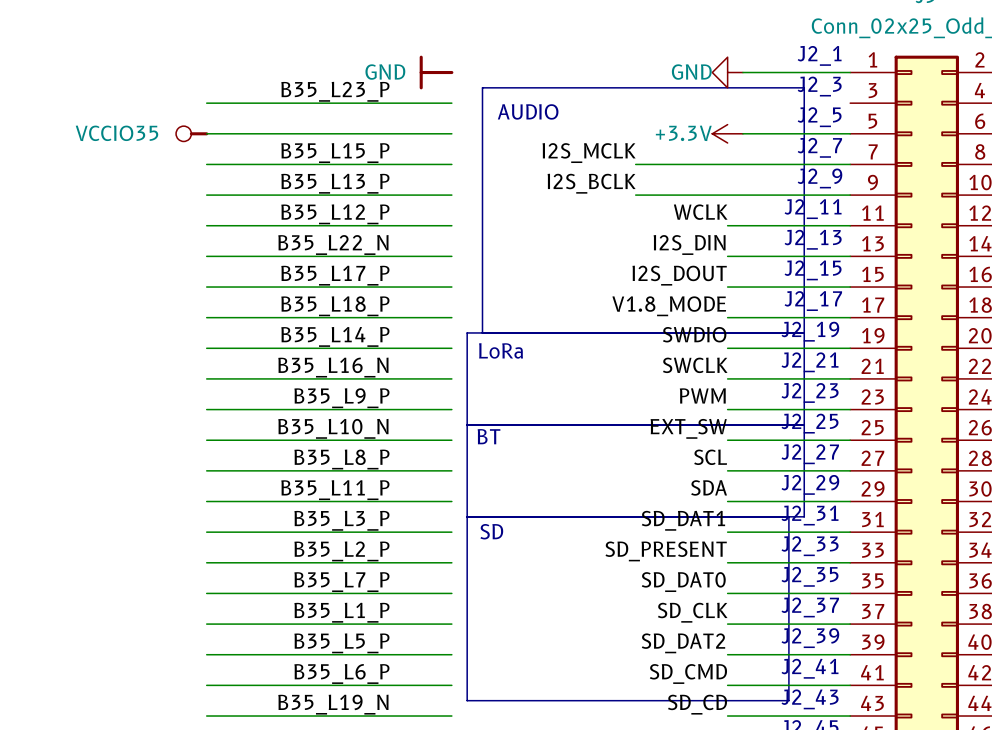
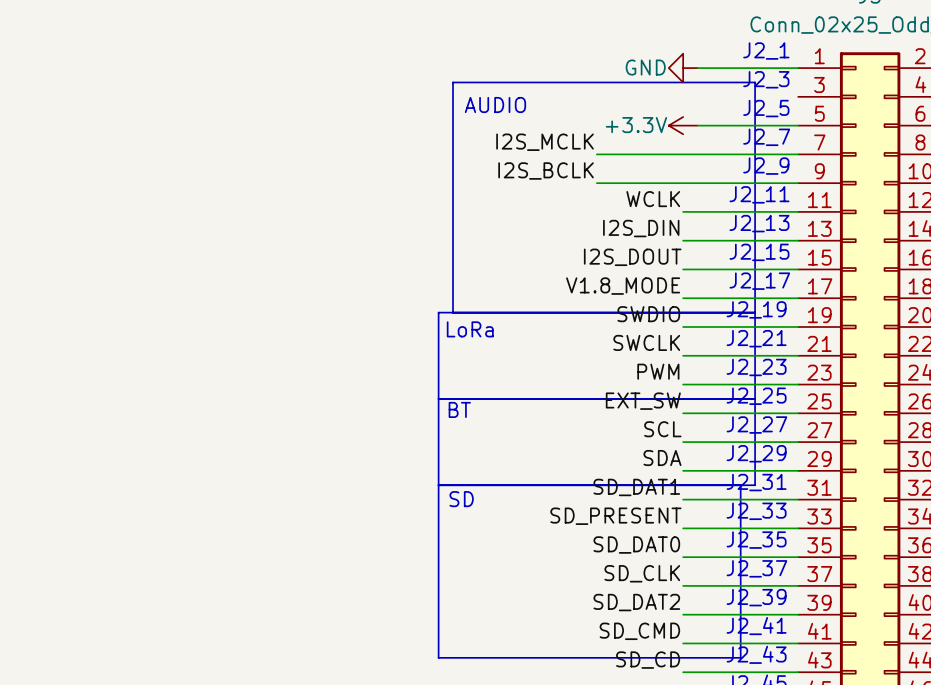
power symbol: GND (436, 72) -> none
label: B35_L23_P (335, 91) -> none
wire: (206, 103) (451, 103) -> none
power symbol: VCCIO35 (191, 133) -> none
wire: (206, 133) (451, 133) -> none
label: B35_L15_P (335, 153) -> none
wire: (206, 164) (451, 164) -> none
label: B35_L13_P (335, 183) -> none
wire: (206, 195) (451, 195) -> none
label: B35_L12_P (335, 214) -> none
wire: (206, 225) (451, 225) -> none
label: B35_L22_N (333, 244) -> none
wire: (206, 256) (451, 256) -> none
label: B35_L17_P (335, 275) -> none
wire: (206, 287) (451, 287) -> none
label: B35_L18_P (335, 306) -> none
wire: (206, 317) (451, 317) -> none
label: B35_L14_P (335, 336) -> none
wire: (206, 348) (451, 348) -> none
label: B35_L16_N (333, 367) -> none
wire: (206, 378) (451, 378) -> none
label: B35_L9_P (341, 398) -> none
wire: (206, 409) (451, 409) -> none
label: B35_L10_N (333, 428) -> none
wire: (206, 440) (451, 440) -> none
label: B35_L8_P (341, 459) -> none
wire: (206, 470) (451, 470) -> none
label: B35_L11_P (335, 490) -> none
wire: (206, 501) (451, 501) -> none
label: B35_L3_P (341, 520) -> none
wire: (206, 532) (451, 532) -> none
label: B35_L2_P (341, 551) -> none
wire: (206, 562) (451, 562) -> none
label: B35_L7_P (341, 582) -> none
wire: (206, 593) (451, 593) -> none
label: B35_L1_P (341, 612) -> none
wire: (206, 624) (451, 624) -> none
label: B35_L5_P (341, 643) -> none
wire: (206, 654) (451, 654) -> none
label: B35_L6_P (341, 673) -> none
wire: (206, 685) (451, 685) -> none
label: B35_L19_N (333, 704) -> none
wire: (206, 716) (451, 716) -> none

